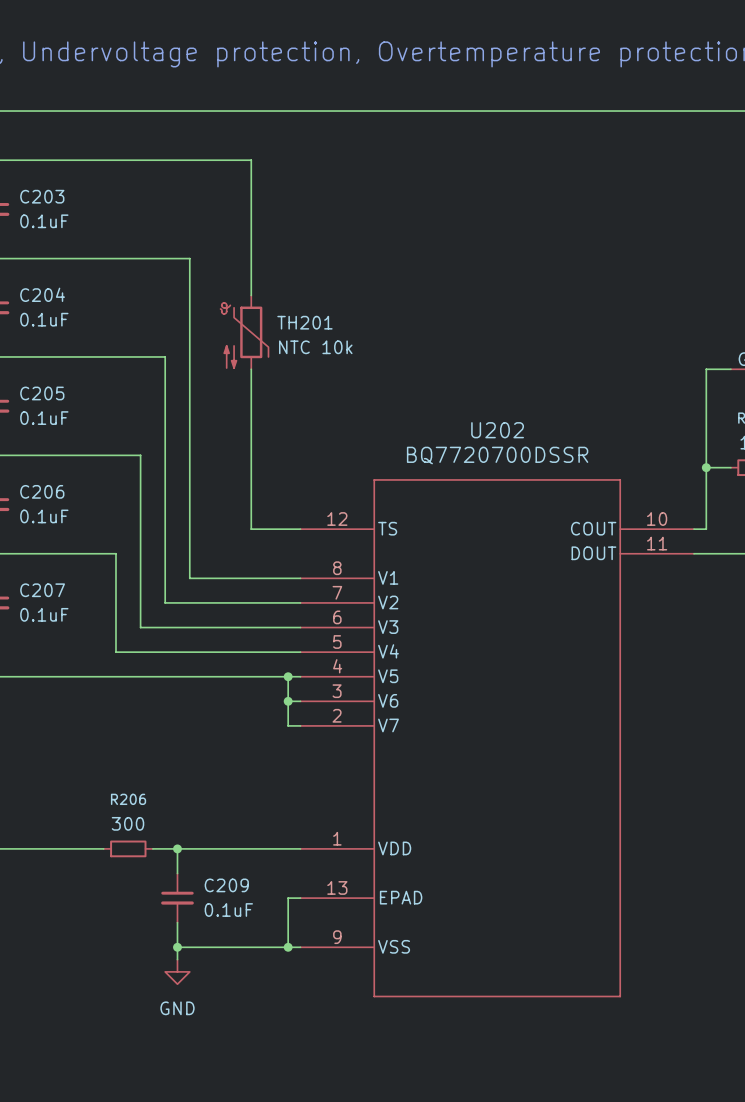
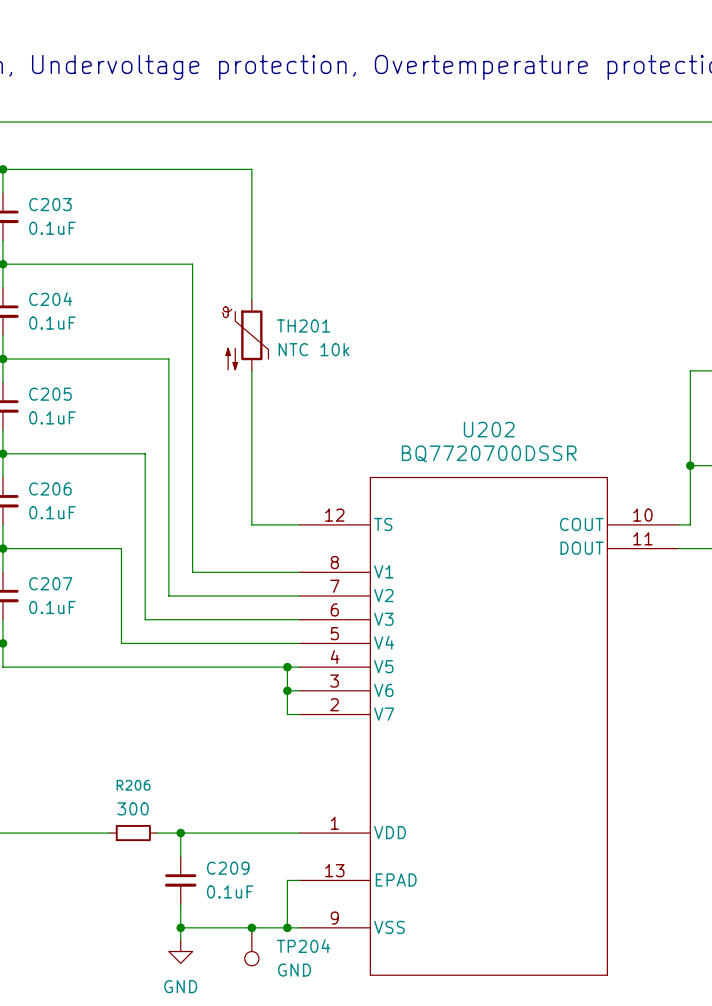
junction: none -> (251, 927)
TP204: none -> GND (251, 946)

